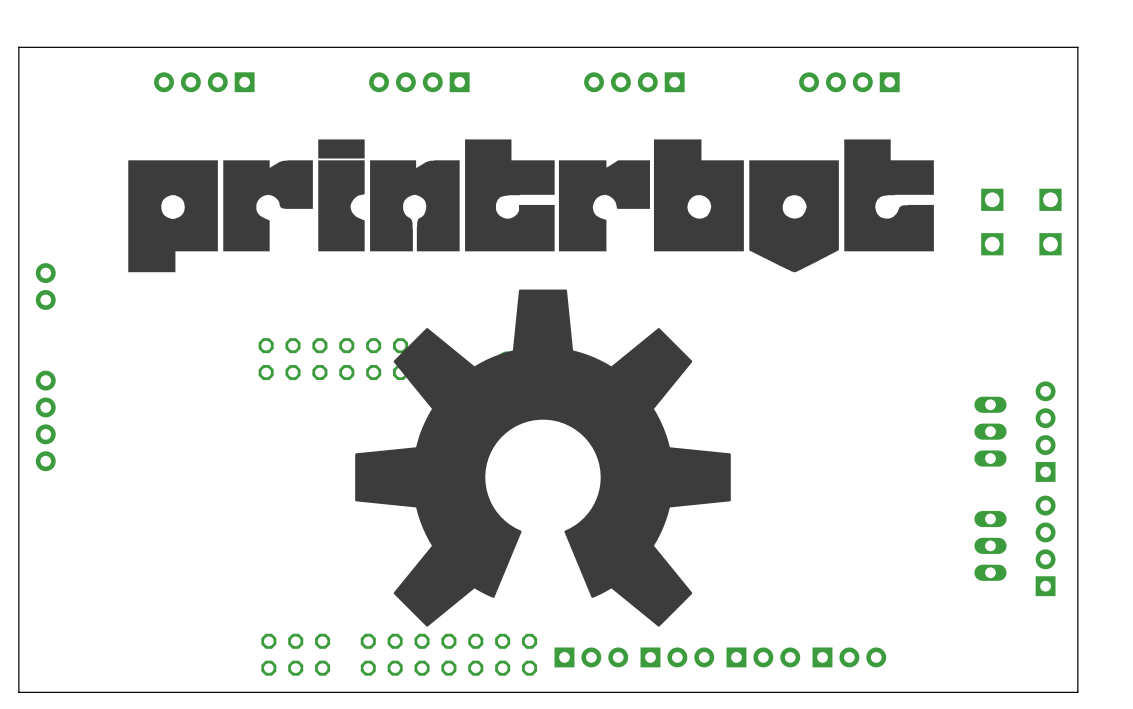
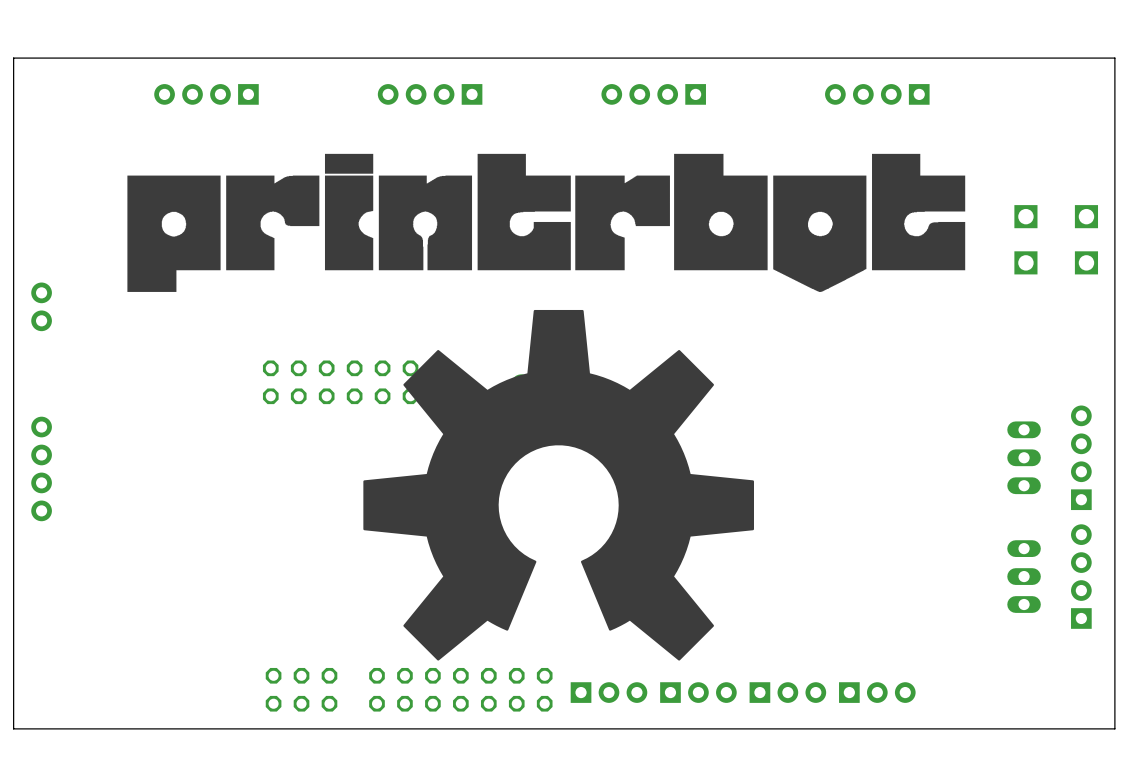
part: (45, 394) -> none
part: none -> (41, 441)
part: (45, 447) -> none
part: none -> (41, 496)

